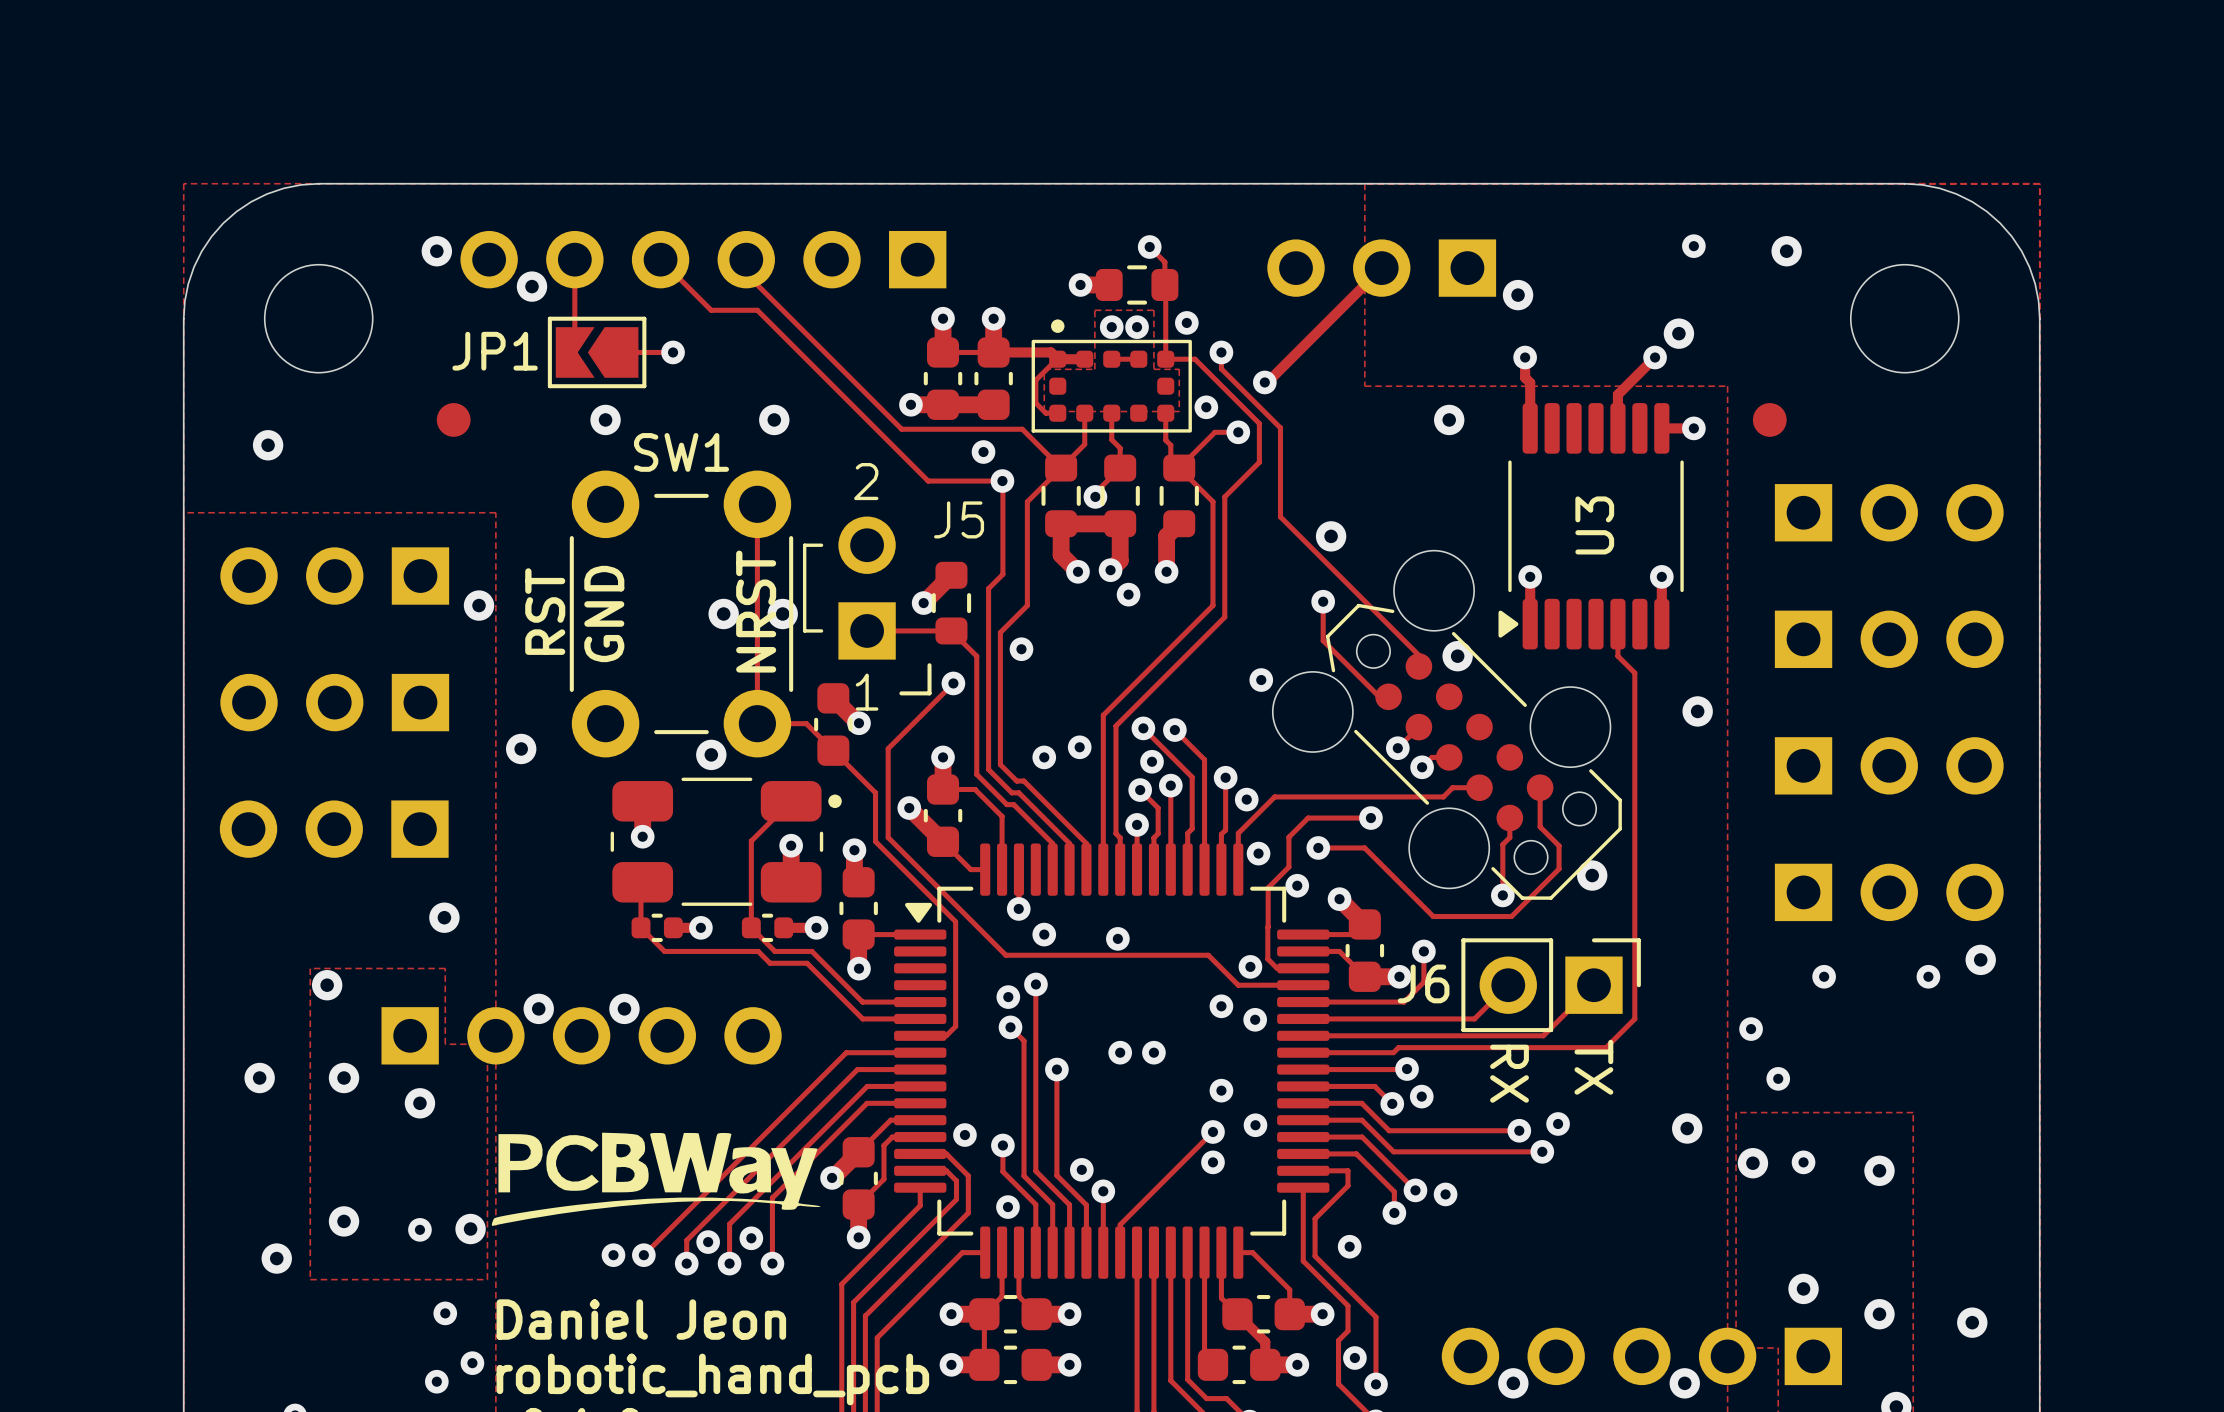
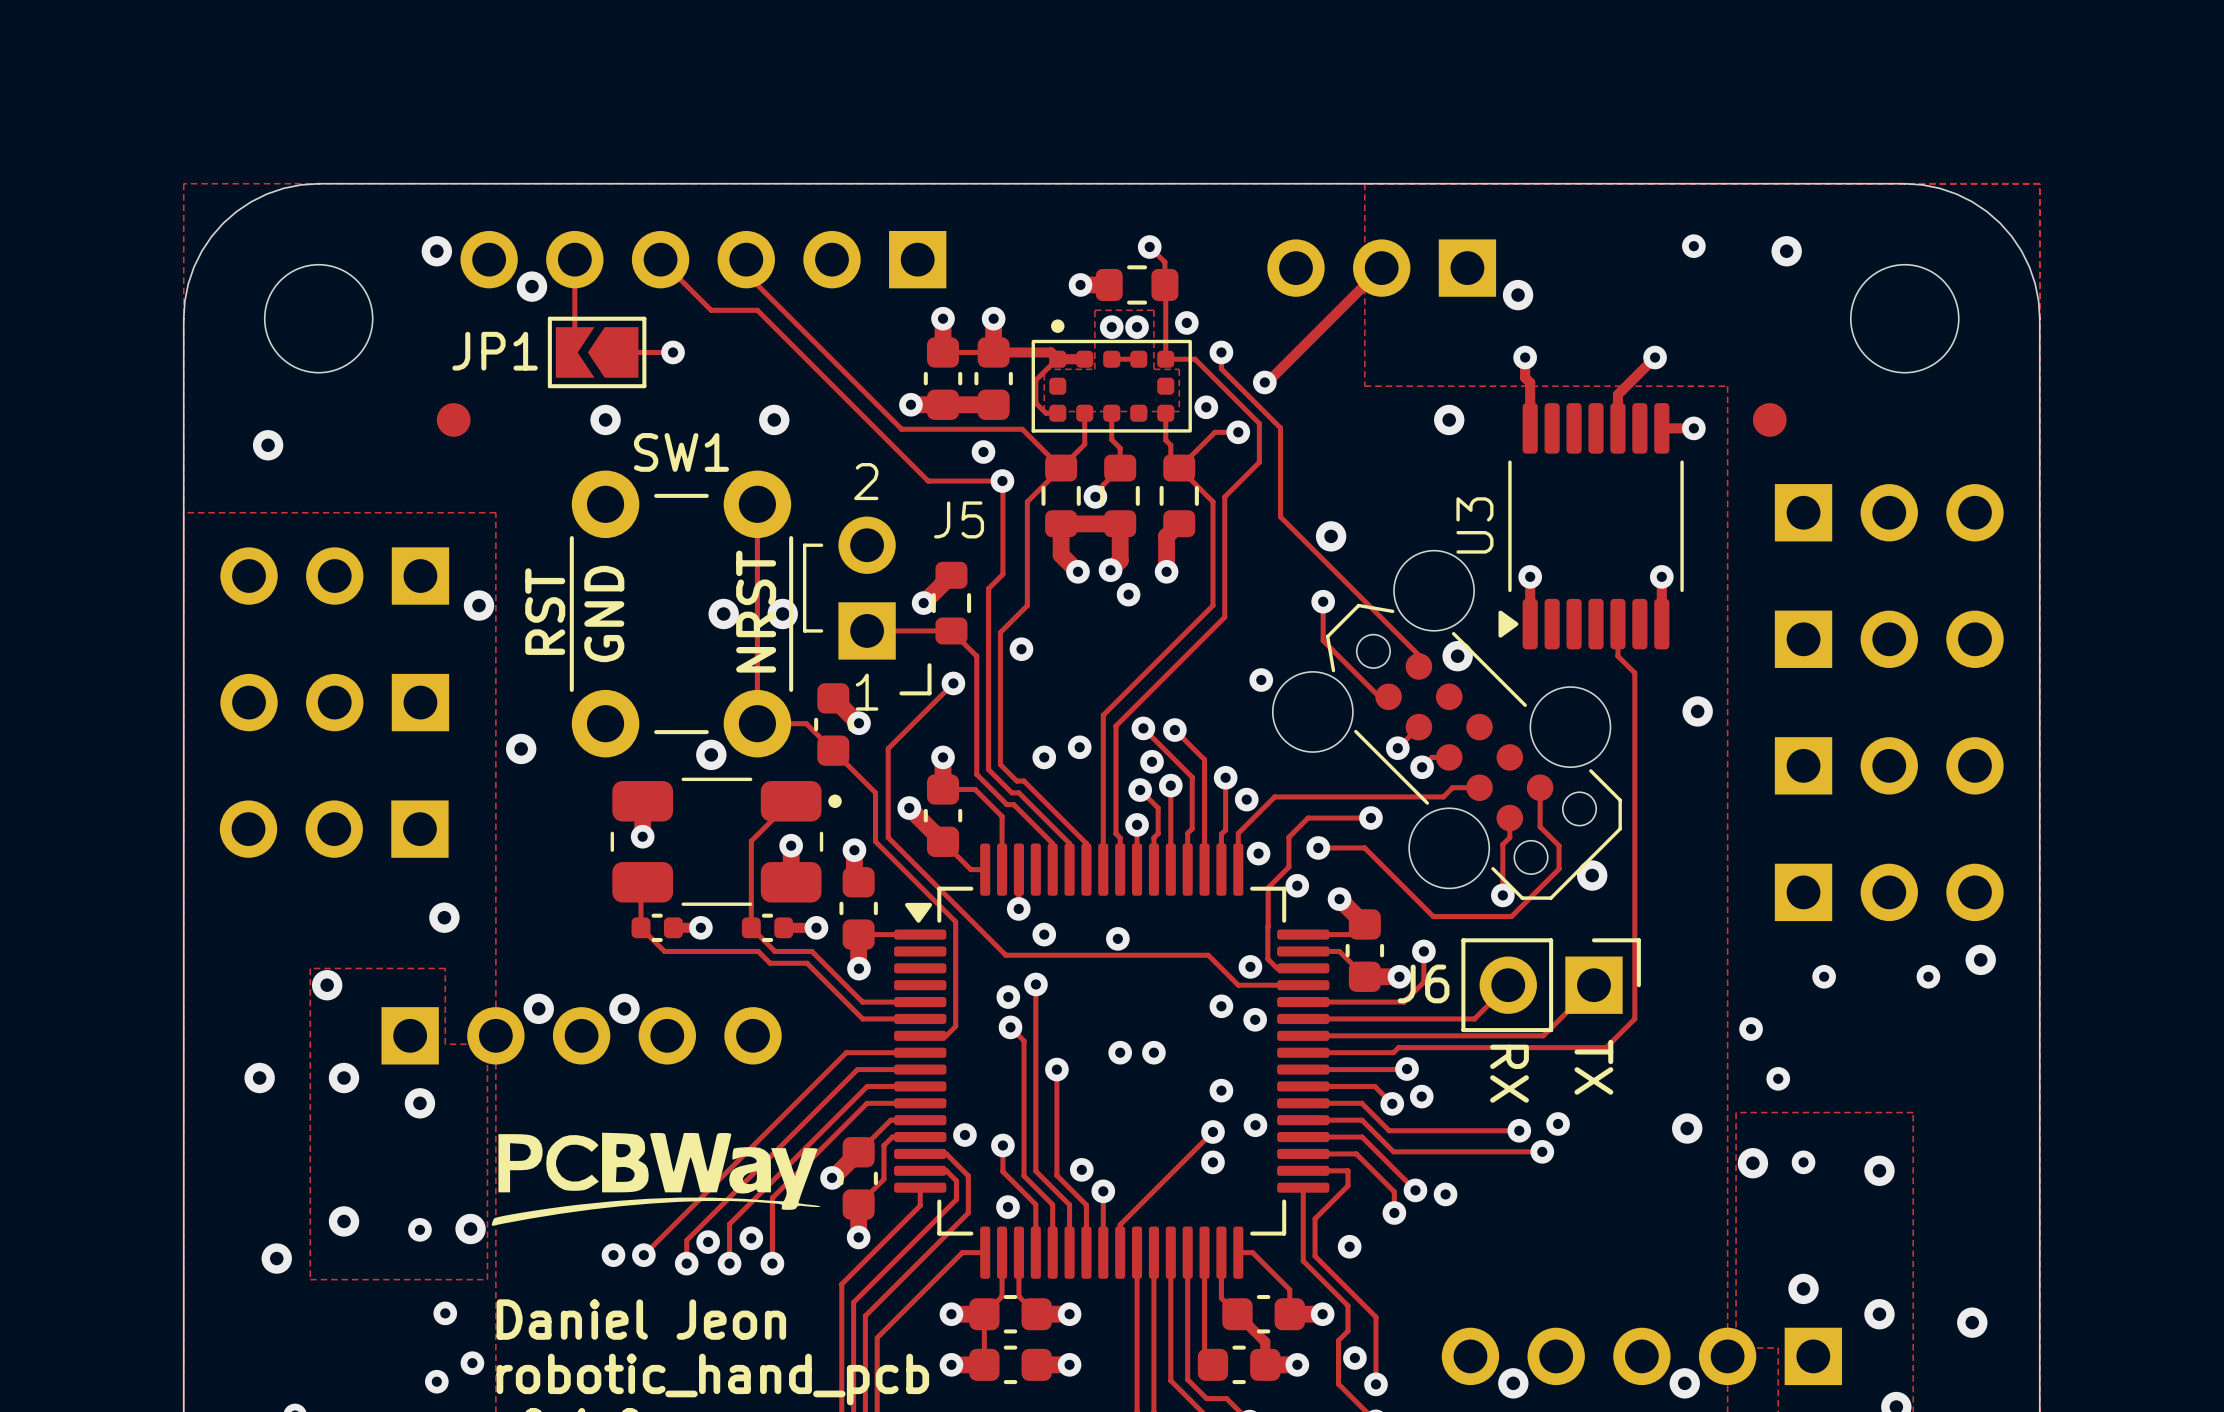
via: (1678, 333) -> none
U3 name position: U3 (1594, 525) -> U3 (1474, 525)

